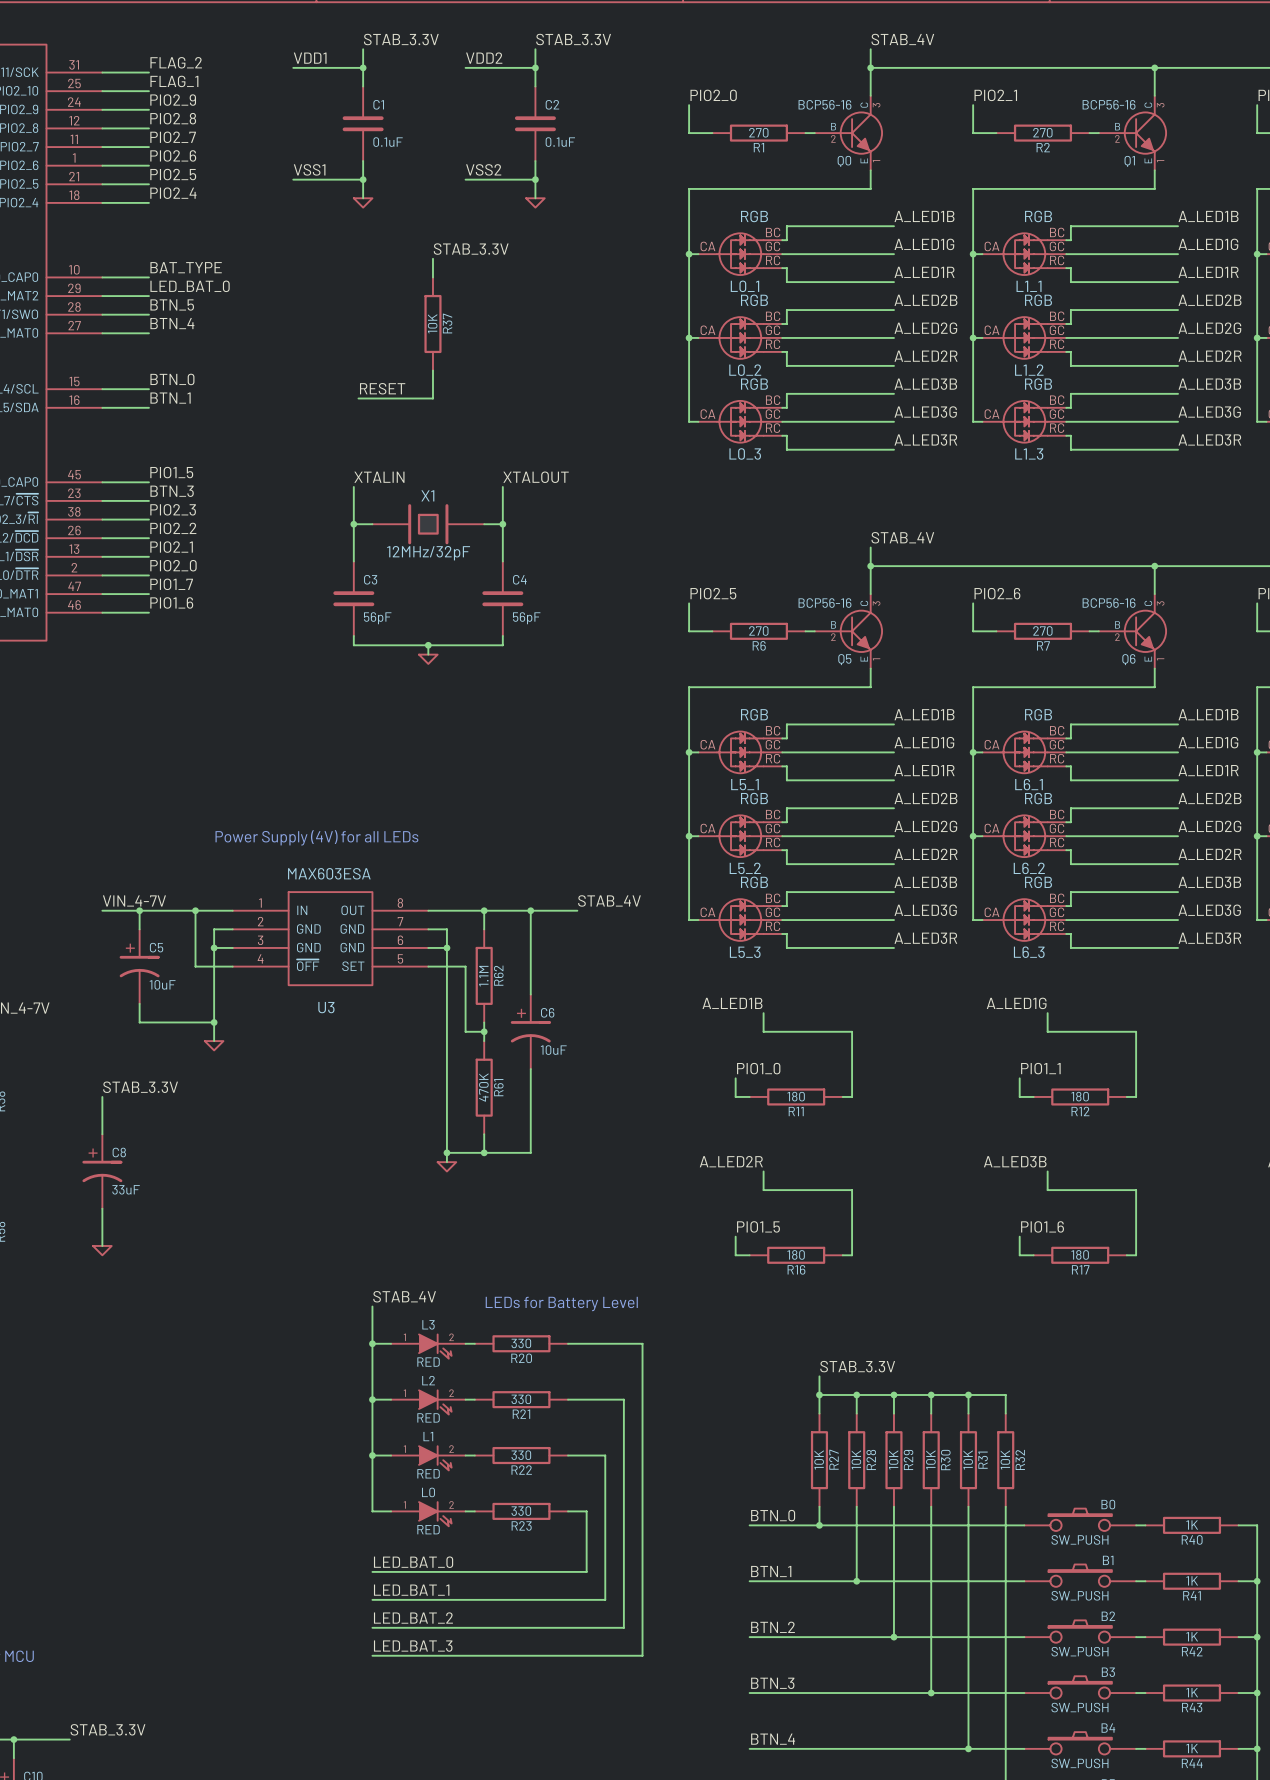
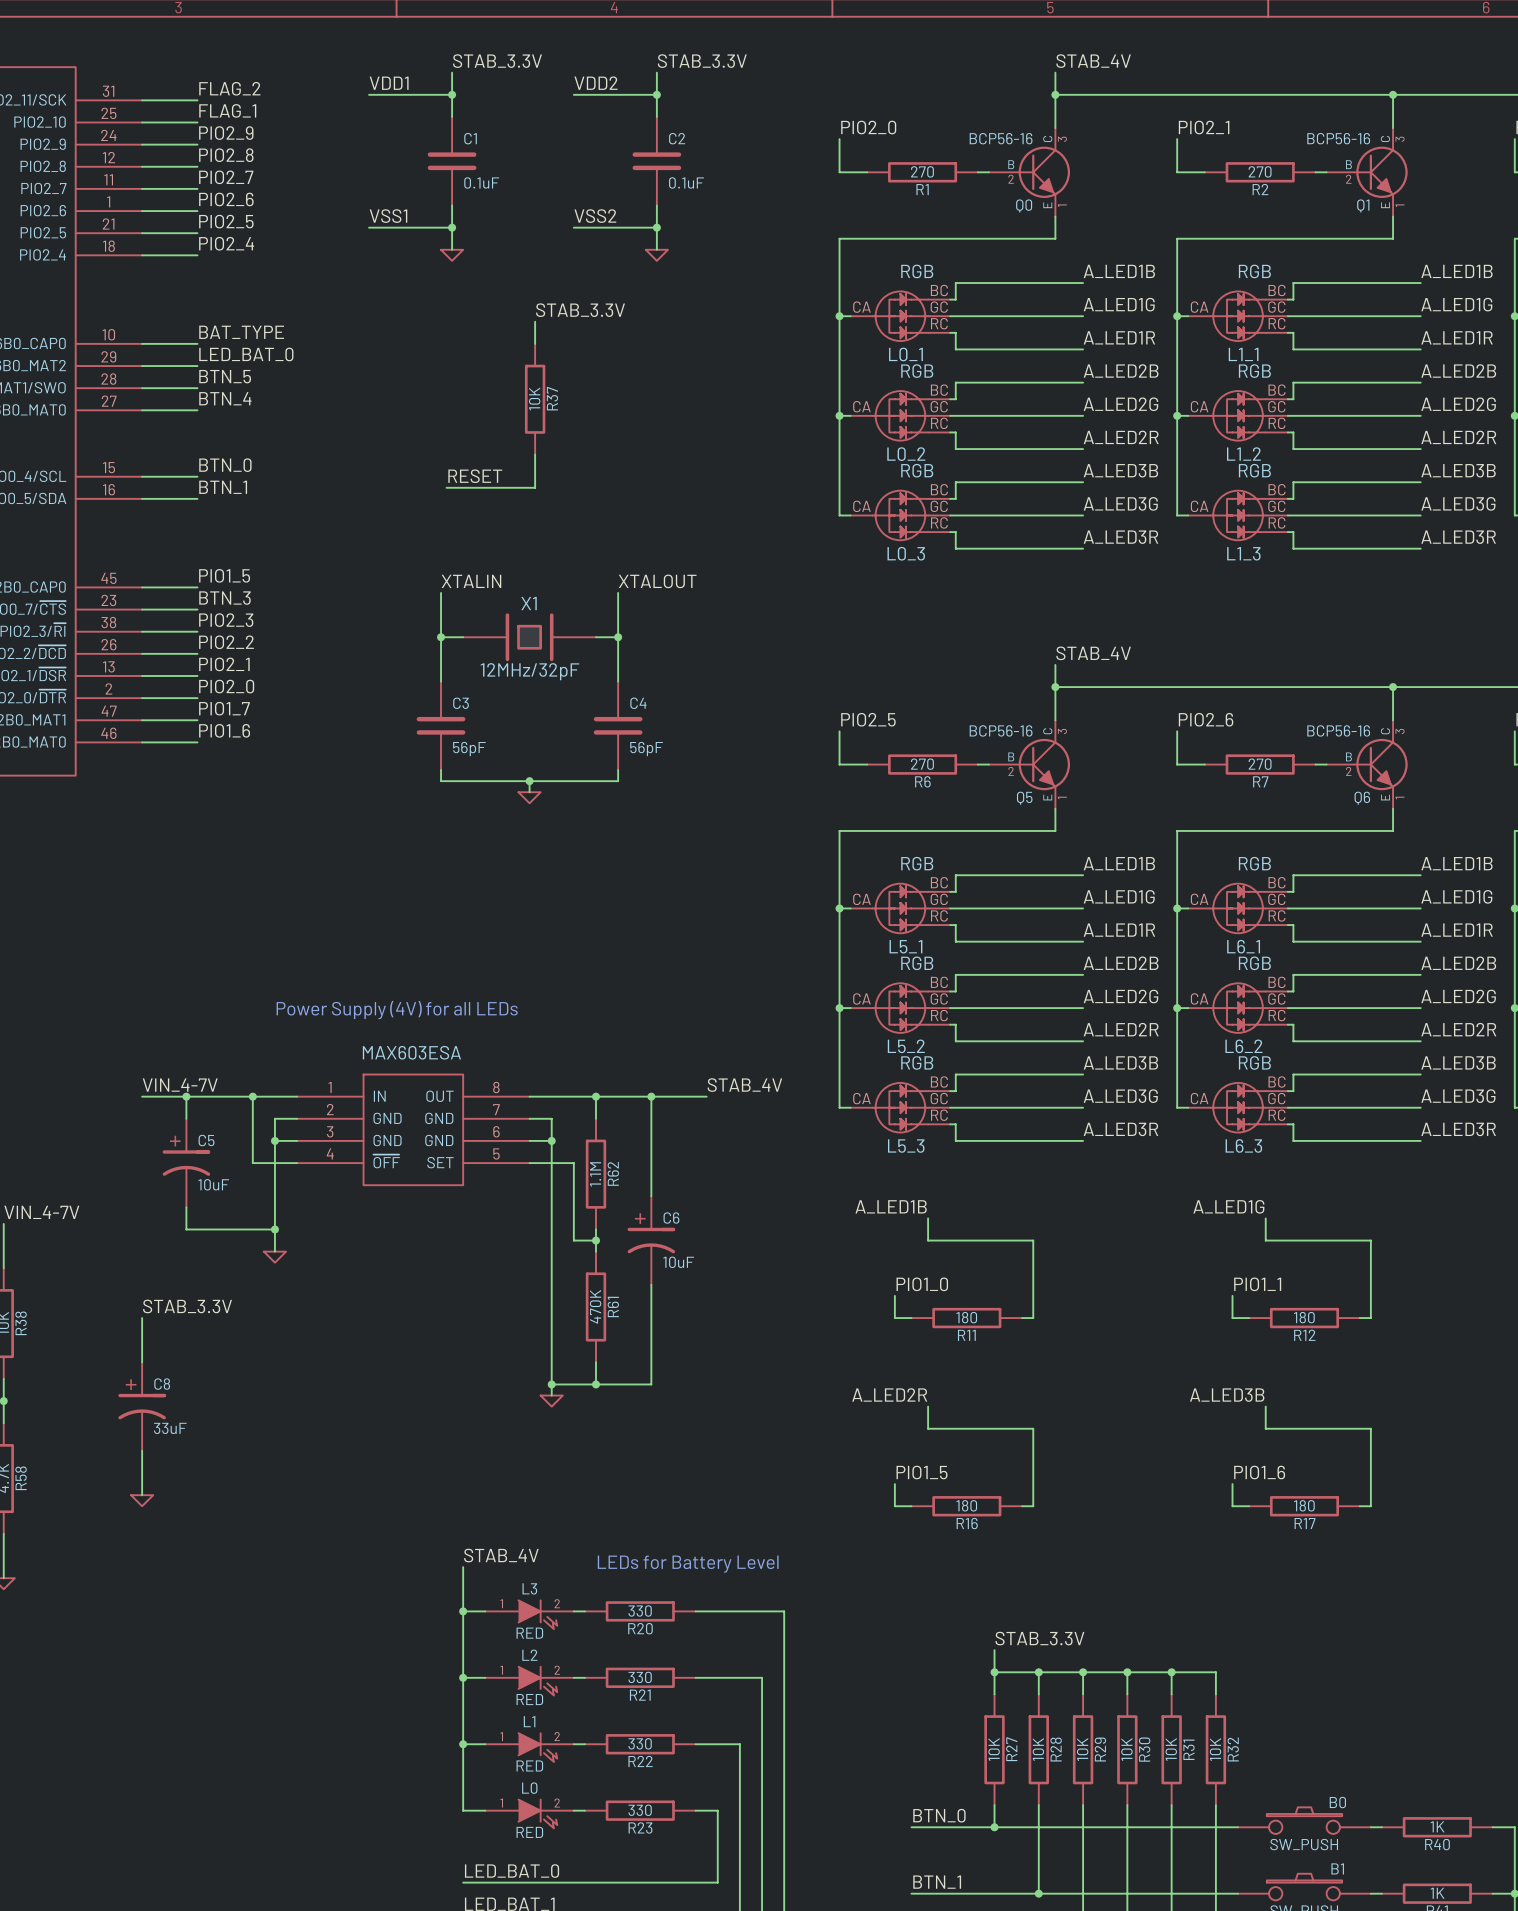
U3: MAX603ESA (330, 938) -> none

